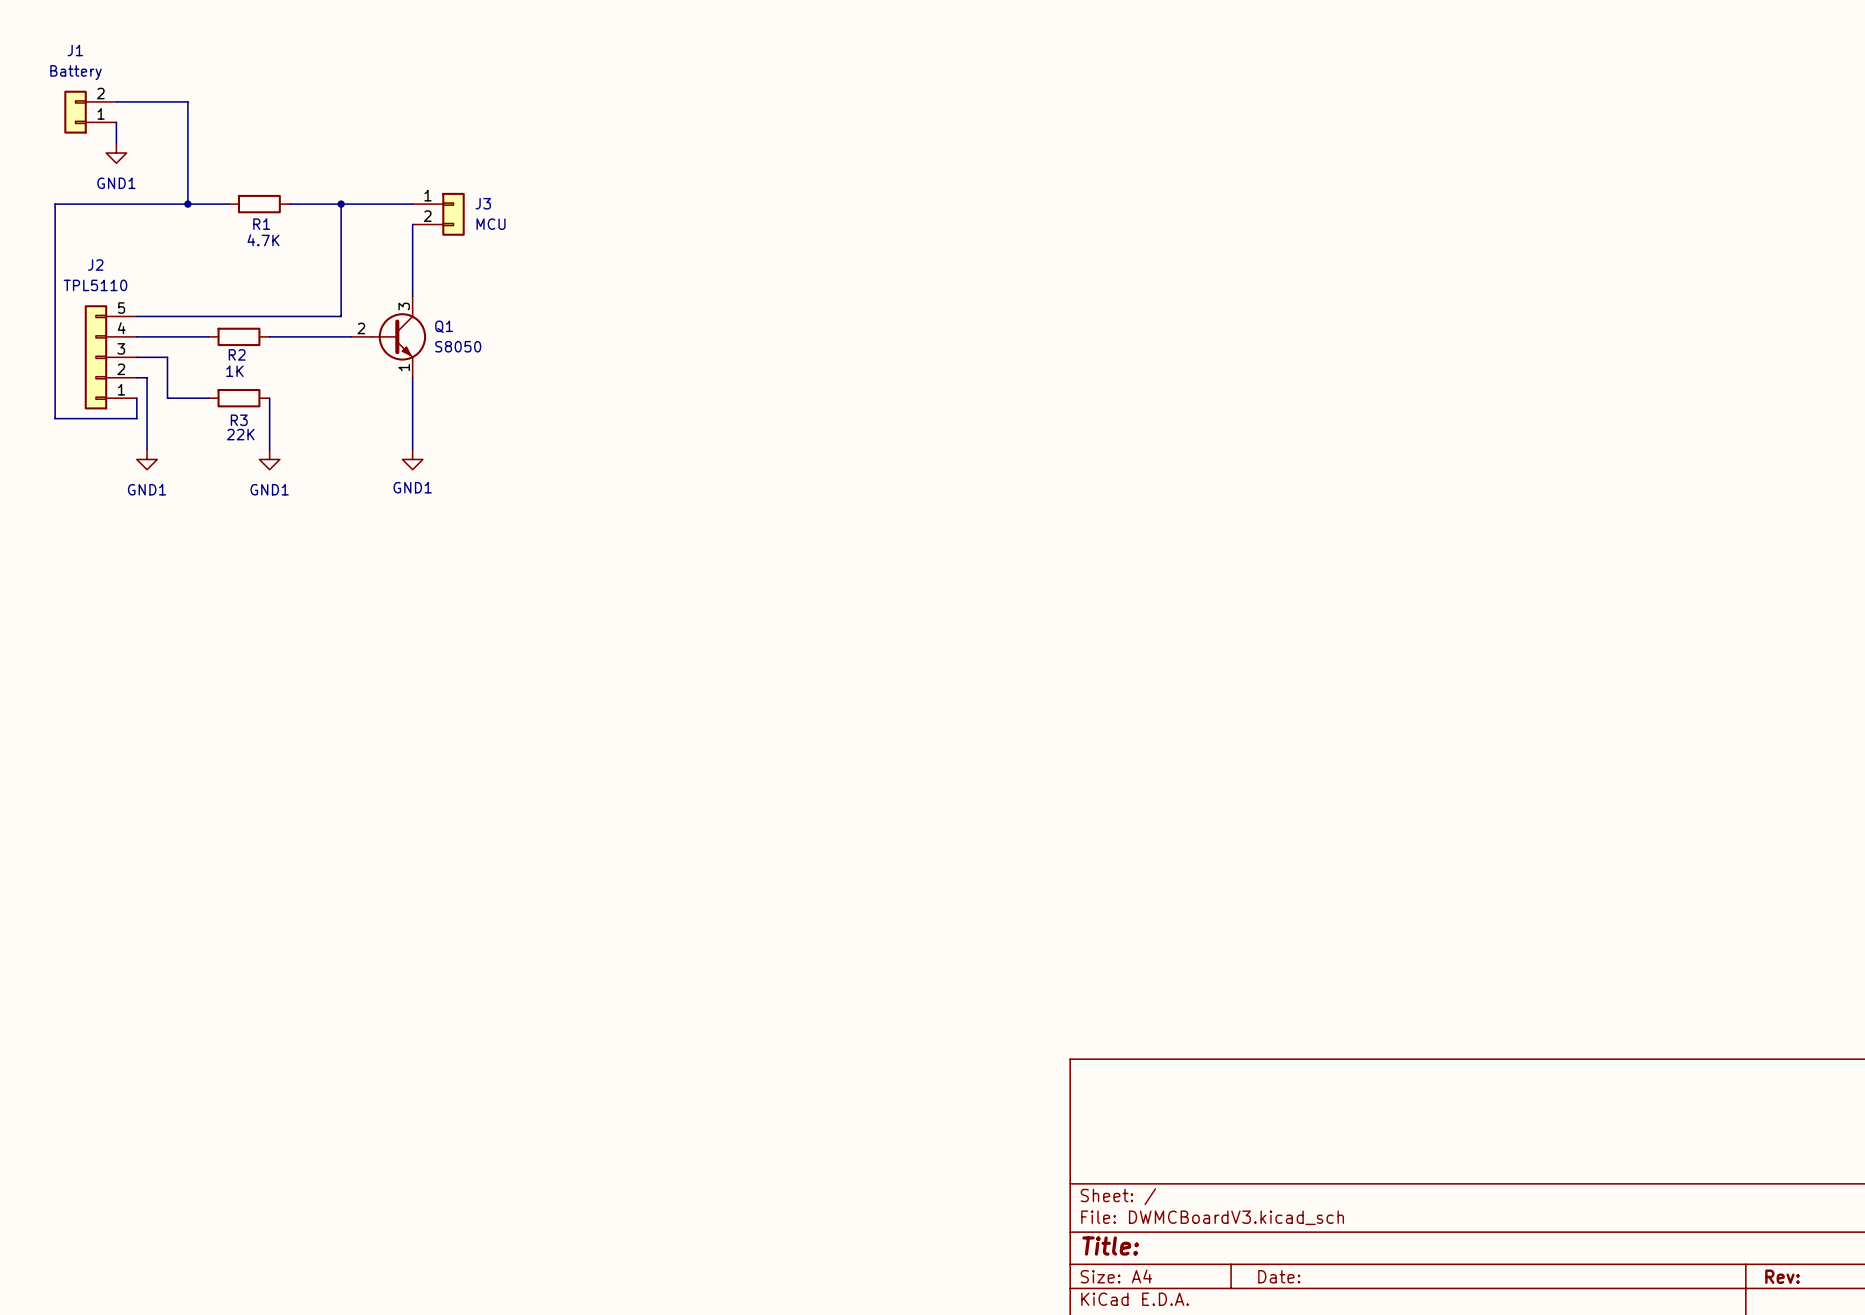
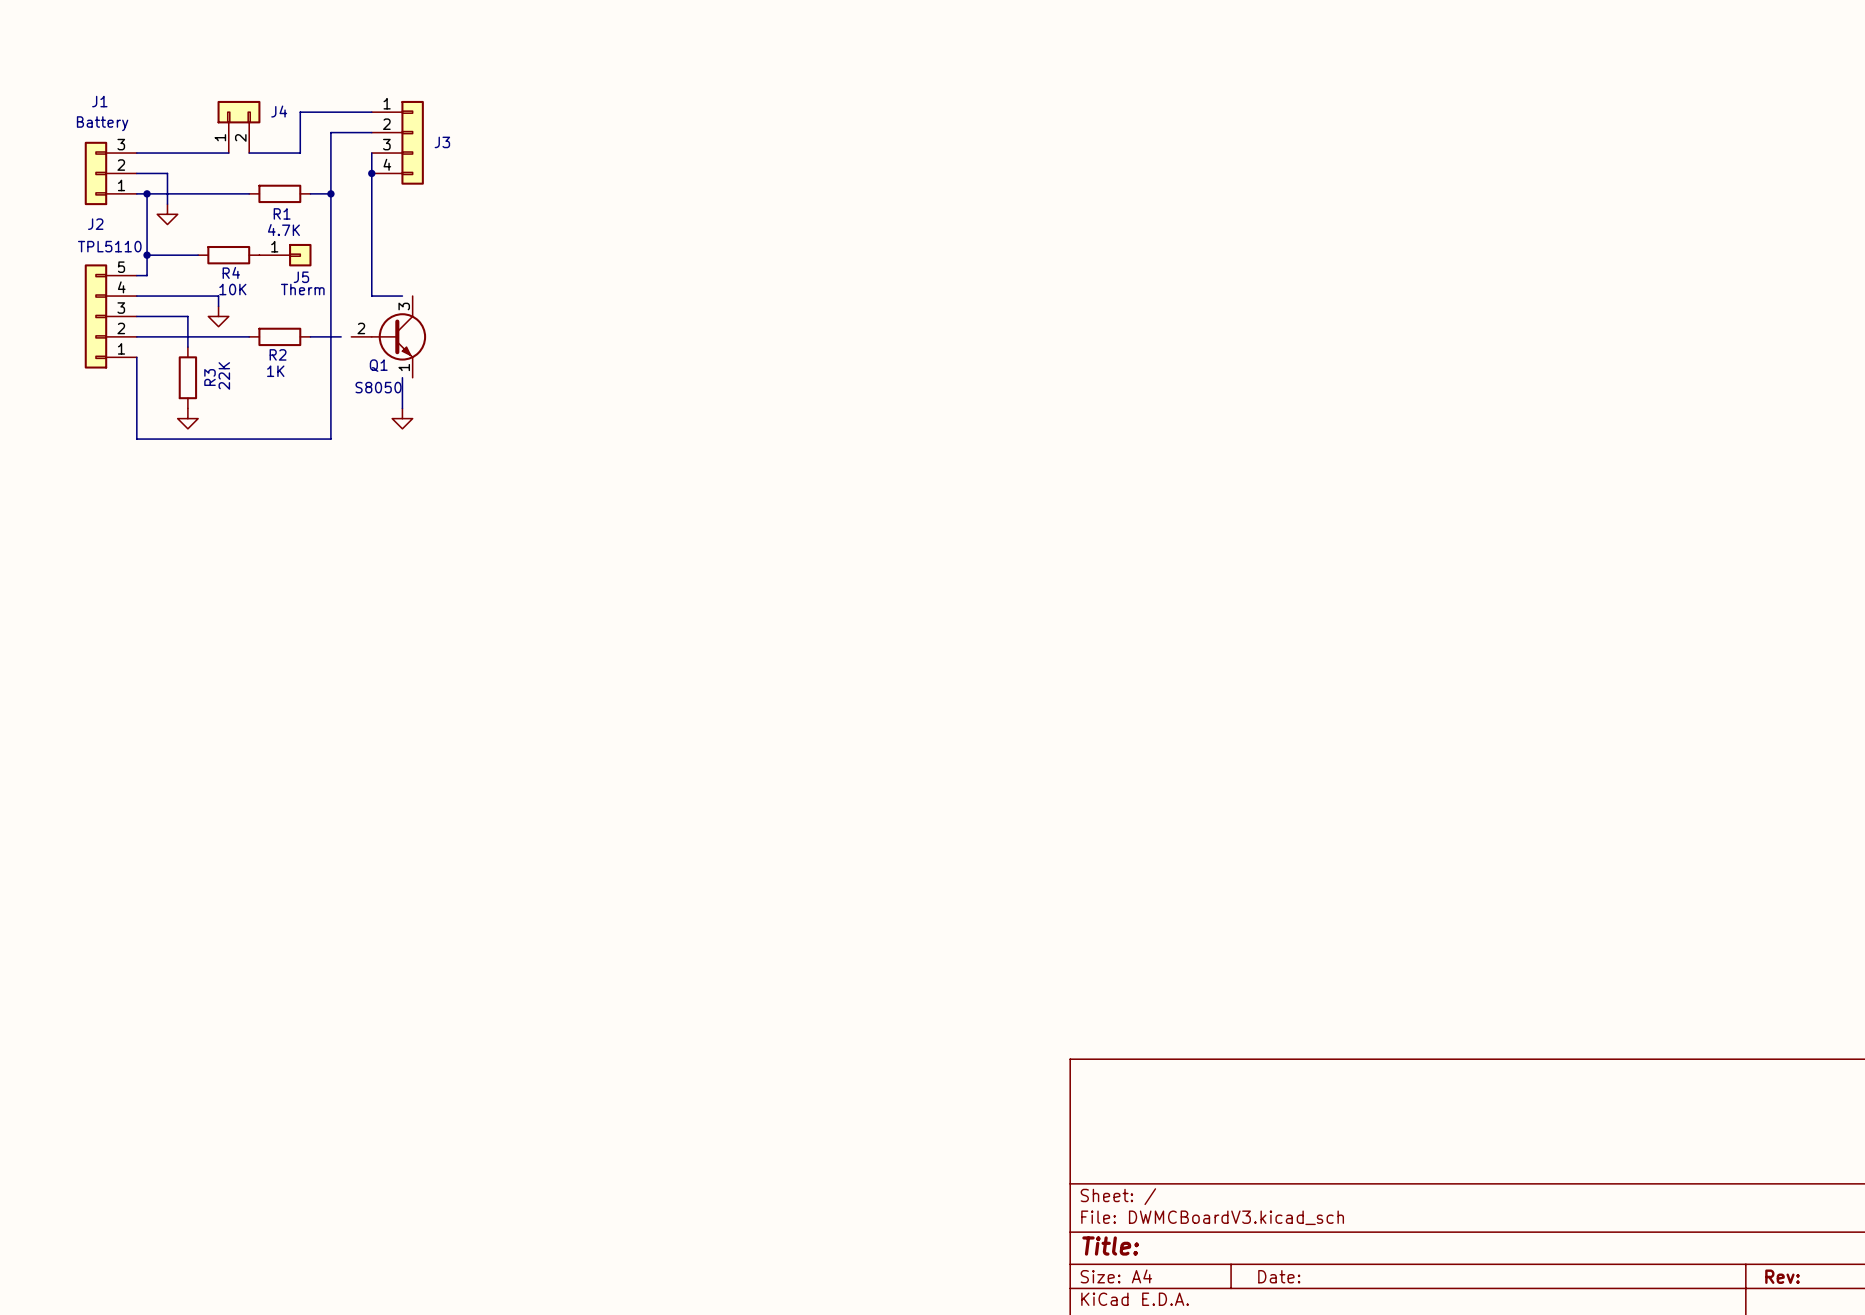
J1 symbol: [64, 90, 117, 134] -> [84, 141, 137, 206]
wire: (116, 101) (187, 101) (187, 204) -> none
wire: none -> (371, 112) (300, 112) (300, 153) (249, 153)
wire: (116, 122) (116, 142) -> none
J4: none -> (238, 126)
power symbol: GND1 (116, 153) -> none
wire: none -> (136, 153) (228, 153)
wire: none -> (371, 153) (371, 296) (402, 296)
wire: none -> (136, 173) (167, 173) (167, 204)
junction: none -> (371, 173)
J3 symbol: [412, 192, 465, 236] -> [371, 100, 424, 185]
wire: none -> (136, 193) (249, 193)
wire: none -> (147, 193) (147, 275) (136, 275)
junction: none -> (147, 193)
wire: none -> (310, 193) (330, 193)
junction: (187, 204) -> none
wire: (228, 204) (55, 204) (55, 418) (136, 418) -> (371, 132) (330, 132) (330, 439) (136, 439) (136, 418)
R1 position: (259, 204) -> (279, 193)
wire: (290, 204) (412, 204) -> none
wire: (341, 204) (341, 316) (187, 316) -> (187, 347) (187, 316)
junction position: (341, 204) -> (330, 193)
power symbol: none -> (167, 214)
wire: (412, 224) (412, 296) -> none
J3 value: MCU (491, 224) -> none
wire: none -> (147, 255) (198, 255)
junction: none -> (147, 255)
R4: none -> 10K (228, 255)
J5: none -> Therm (285, 255)
J2 value position: TPL5110 (95, 285) -> TPL5110 (109, 246)
wire: none -> (136, 296) (218, 296) (218, 306)
power symbol: none -> (218, 316)
Q1 name position: Q1 (444, 326) -> Q1 (378, 365)
R2 position: (238, 336) -> (279, 336)
wire: (269, 336) (310, 336) -> (208, 336) (249, 336)
wire: (341, 336) (351, 336) -> none
Q1 value position: S8050 (458, 346) -> S8050 (378, 387)
J2 position: (110, 357) -> (110, 316)
wire: (136, 357) (167, 357) (167, 398) (208, 398) -> (136, 357) (136, 398)
wire: (136, 377) (147, 377) (147, 449) -> none
wire: none -> (402, 377) (402, 408)
wire: (412, 377) (412, 449) -> none
R3 rotation: 0° (238, 398) -> 90° clockwise (187, 377)
R3 position: (238, 398) -> (187, 377)
wire: (269, 398) (269, 449) -> none
power symbol: none -> (187, 418)
power symbol: none -> (402, 418)
R3 name position: R3 (239, 420) -> R3 (210, 377)
R3 value position: 22K (240, 434) -> 22K (224, 375)
power symbol: GND1 (147, 459) -> none
power symbol: GND1 (269, 459) -> none
power symbol: GND1 (412, 459) -> none

